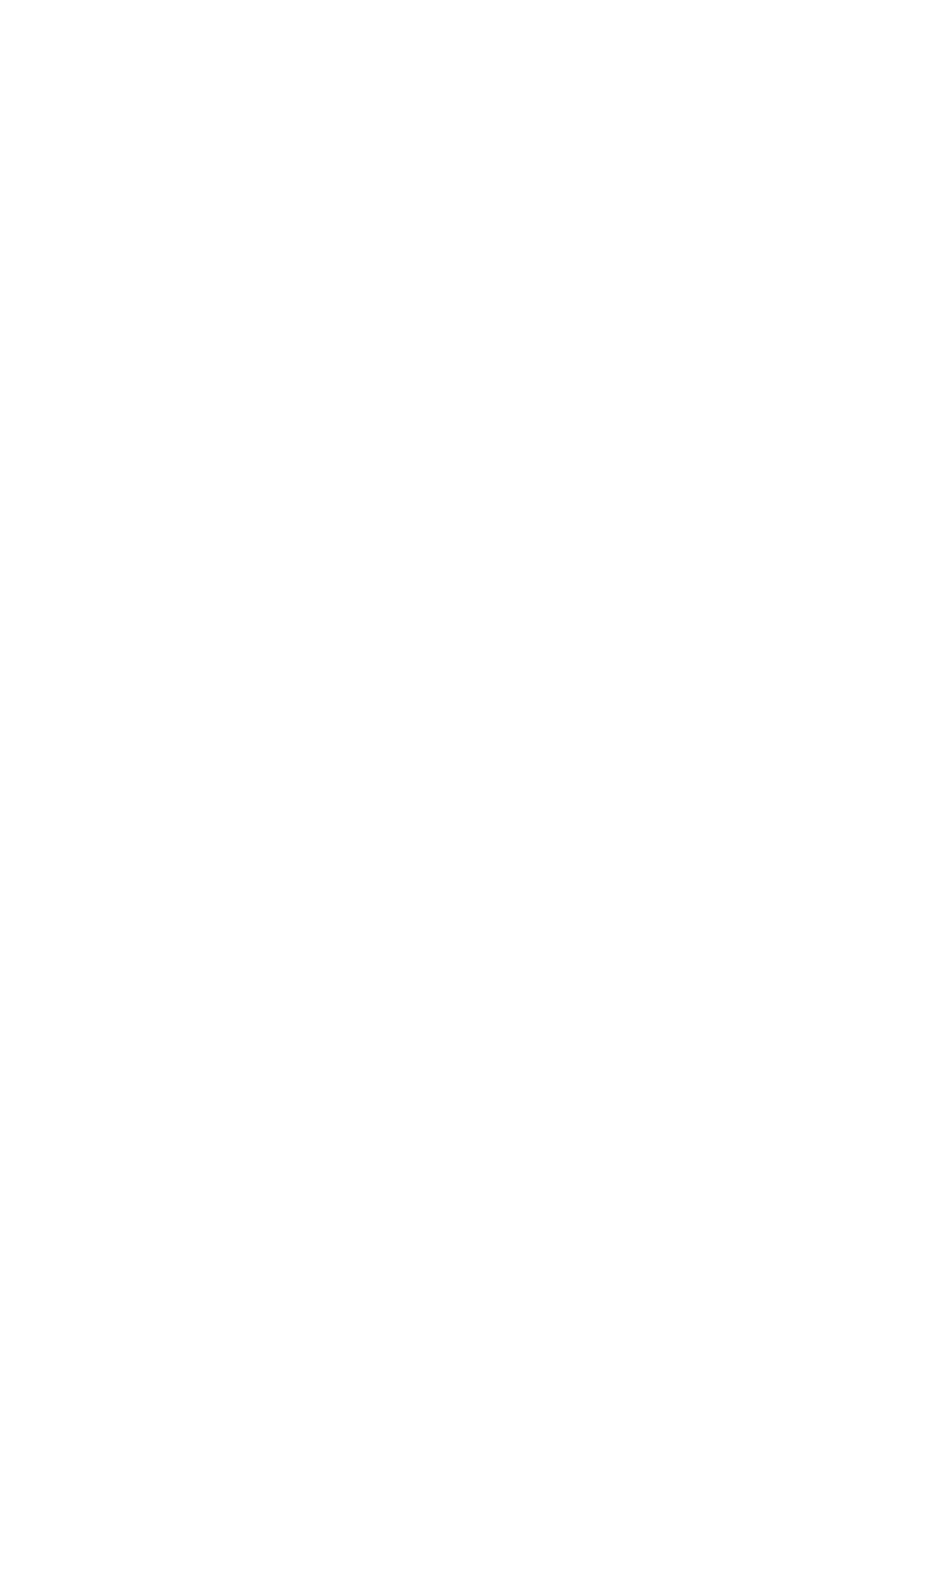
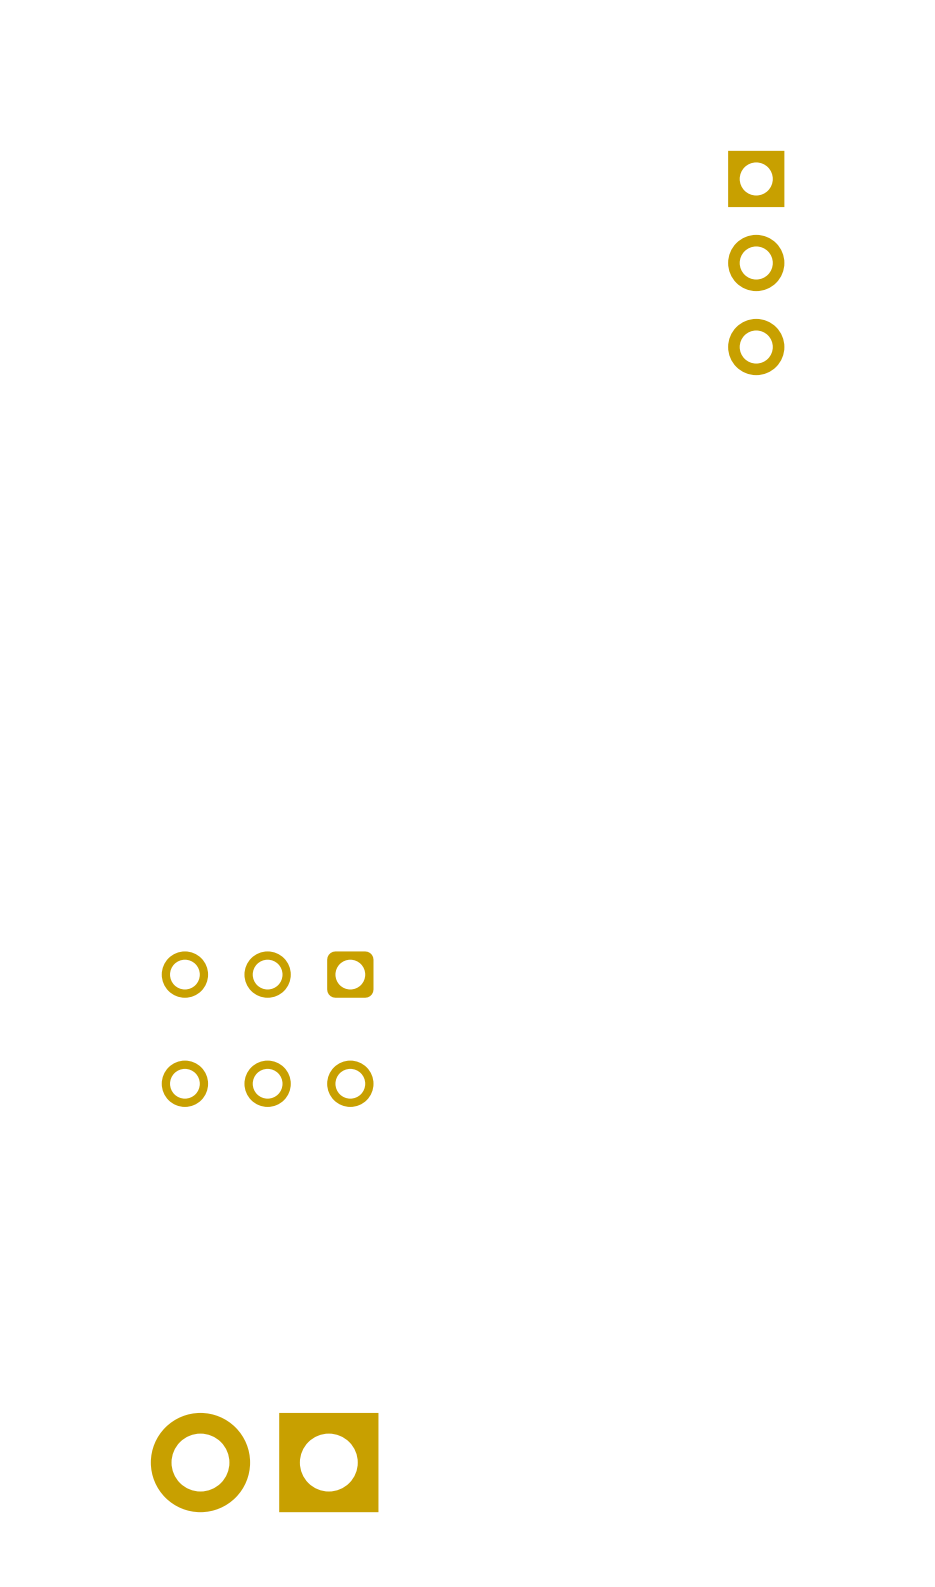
part: none -> (756, 262)
part: none -> (267, 1029)
part: none -> (264, 1462)

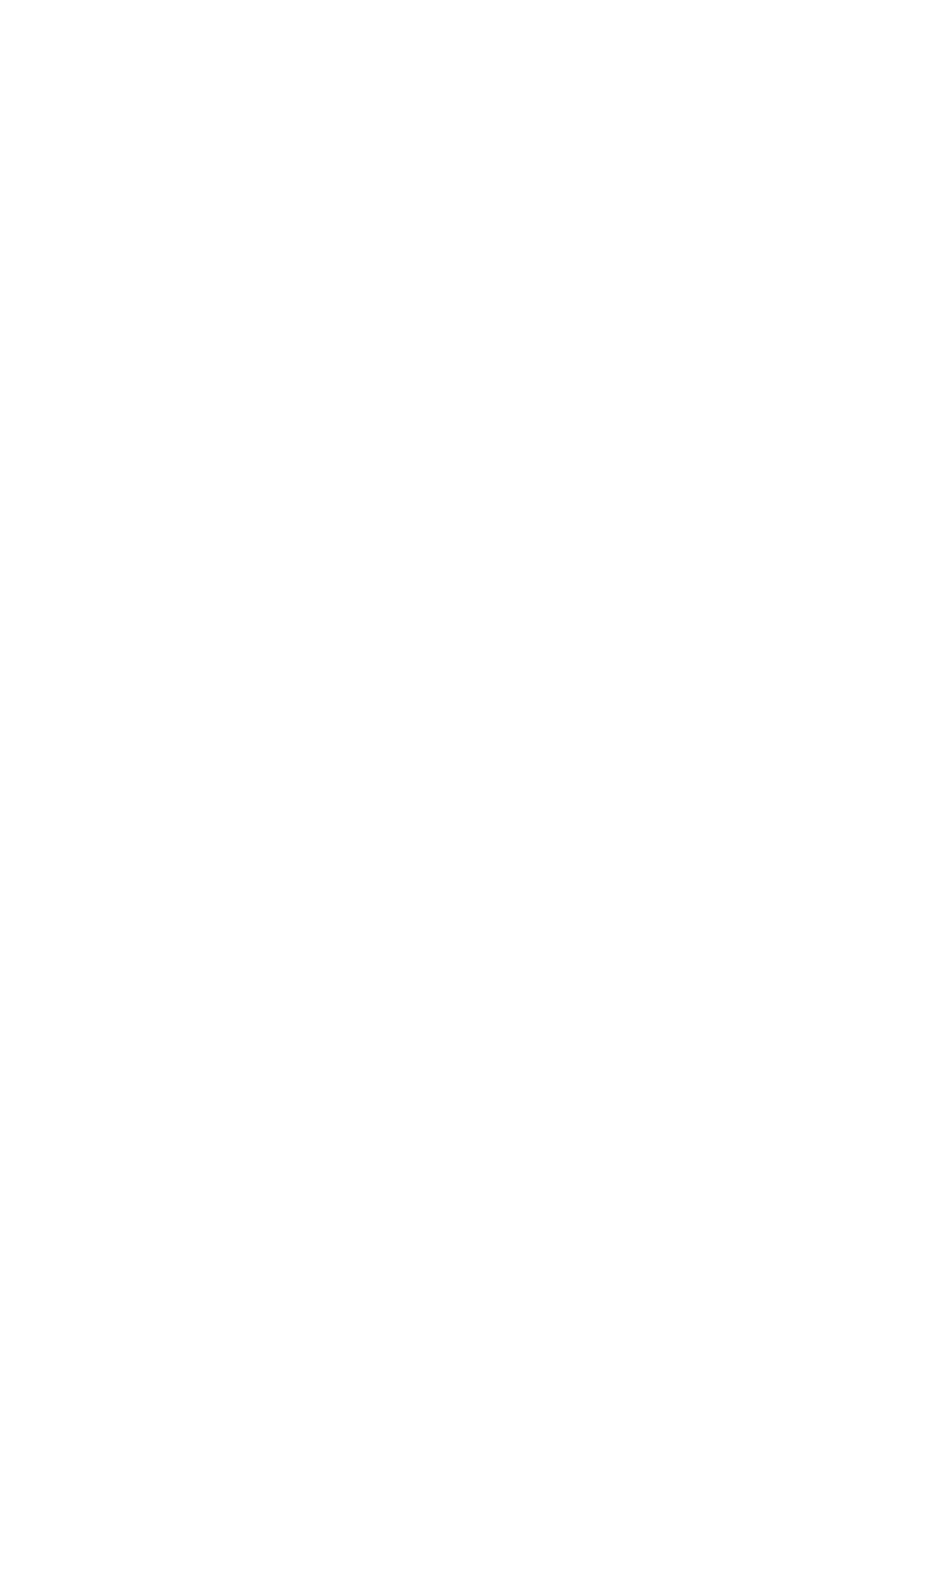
part: (756, 262) -> none
part: (267, 1029) -> none
part: (264, 1462) -> none

